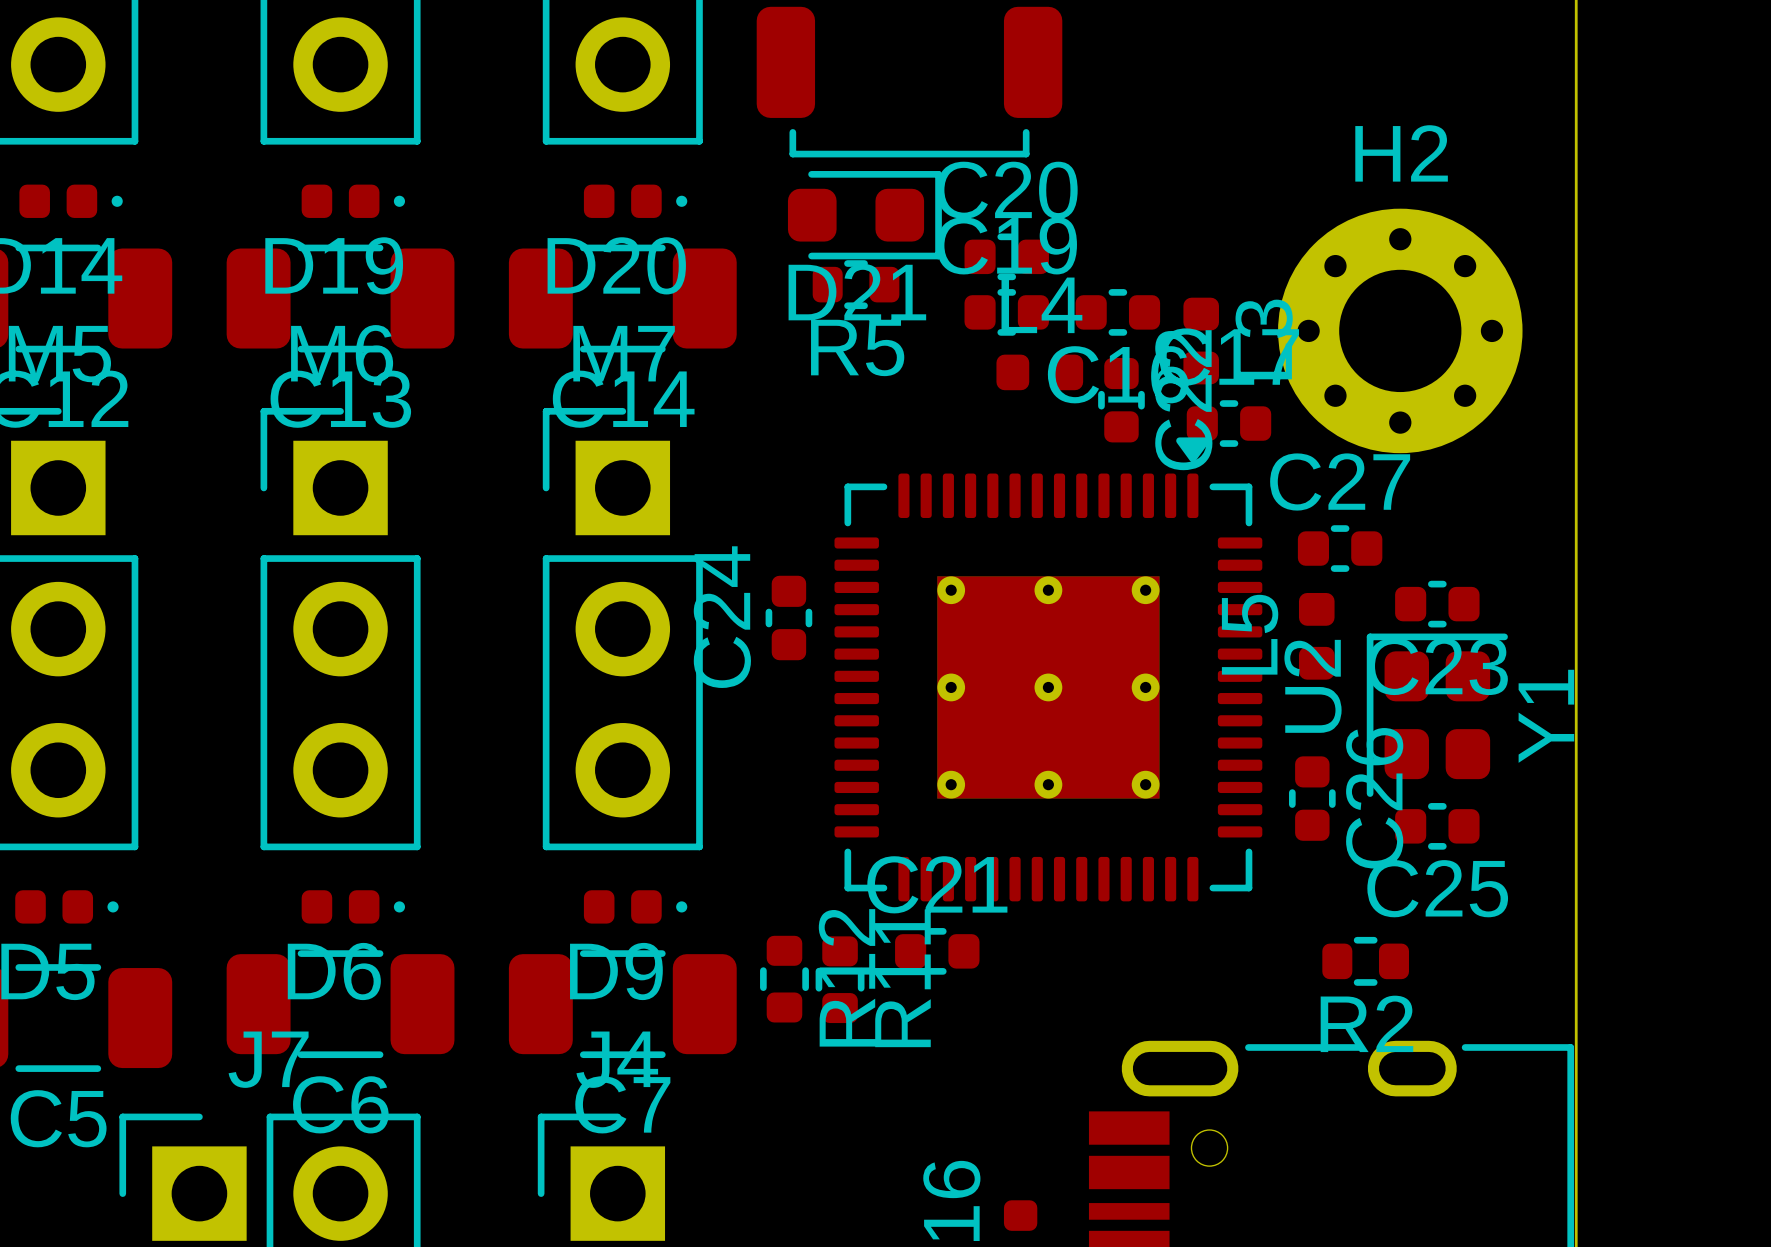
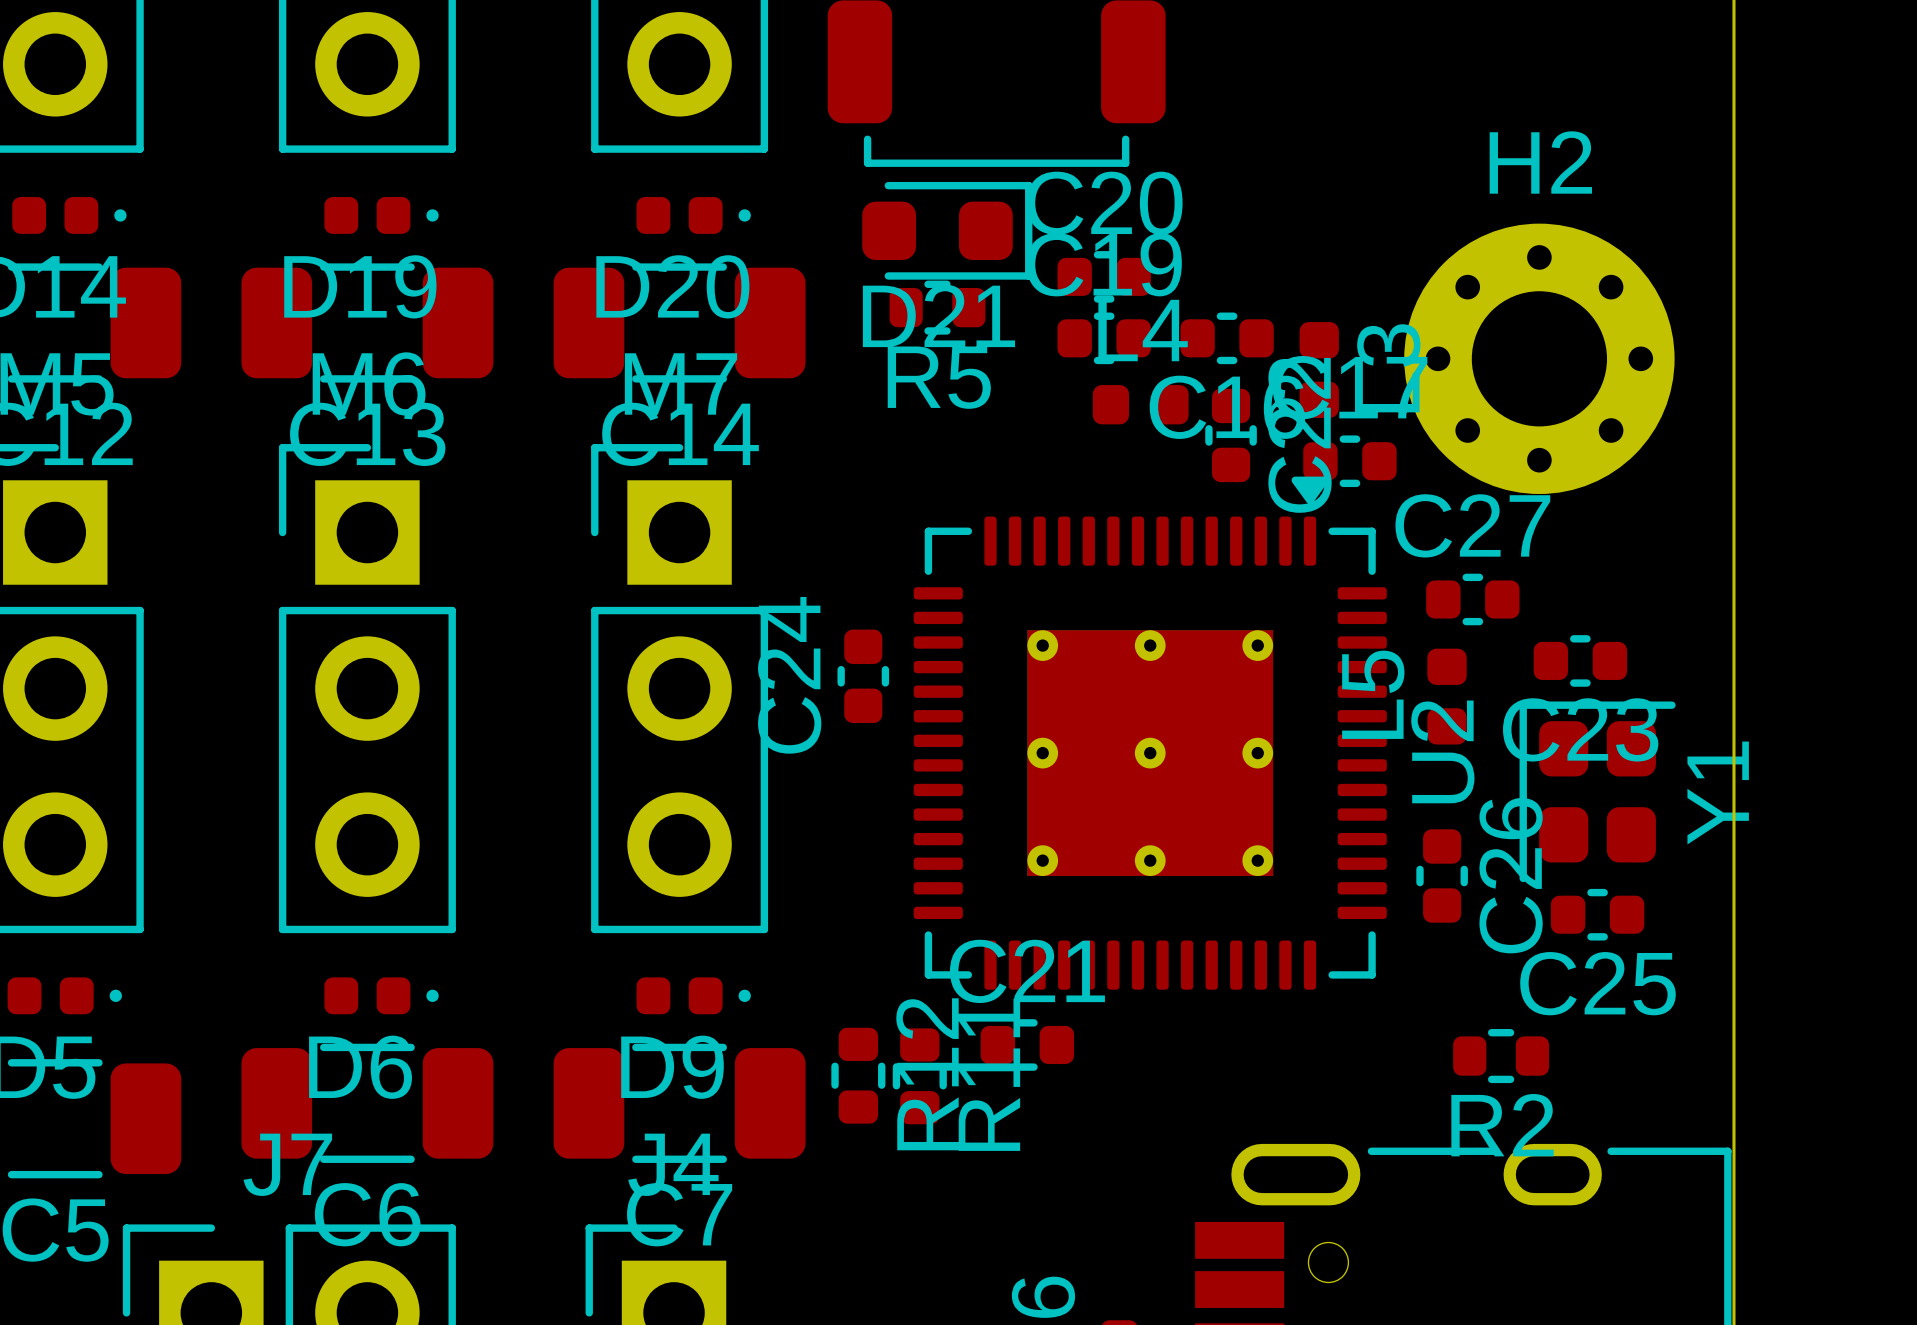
Y1 position: (1437, 715) -> (1597, 791)
C25 position: (1437, 826) -> (1597, 914)

